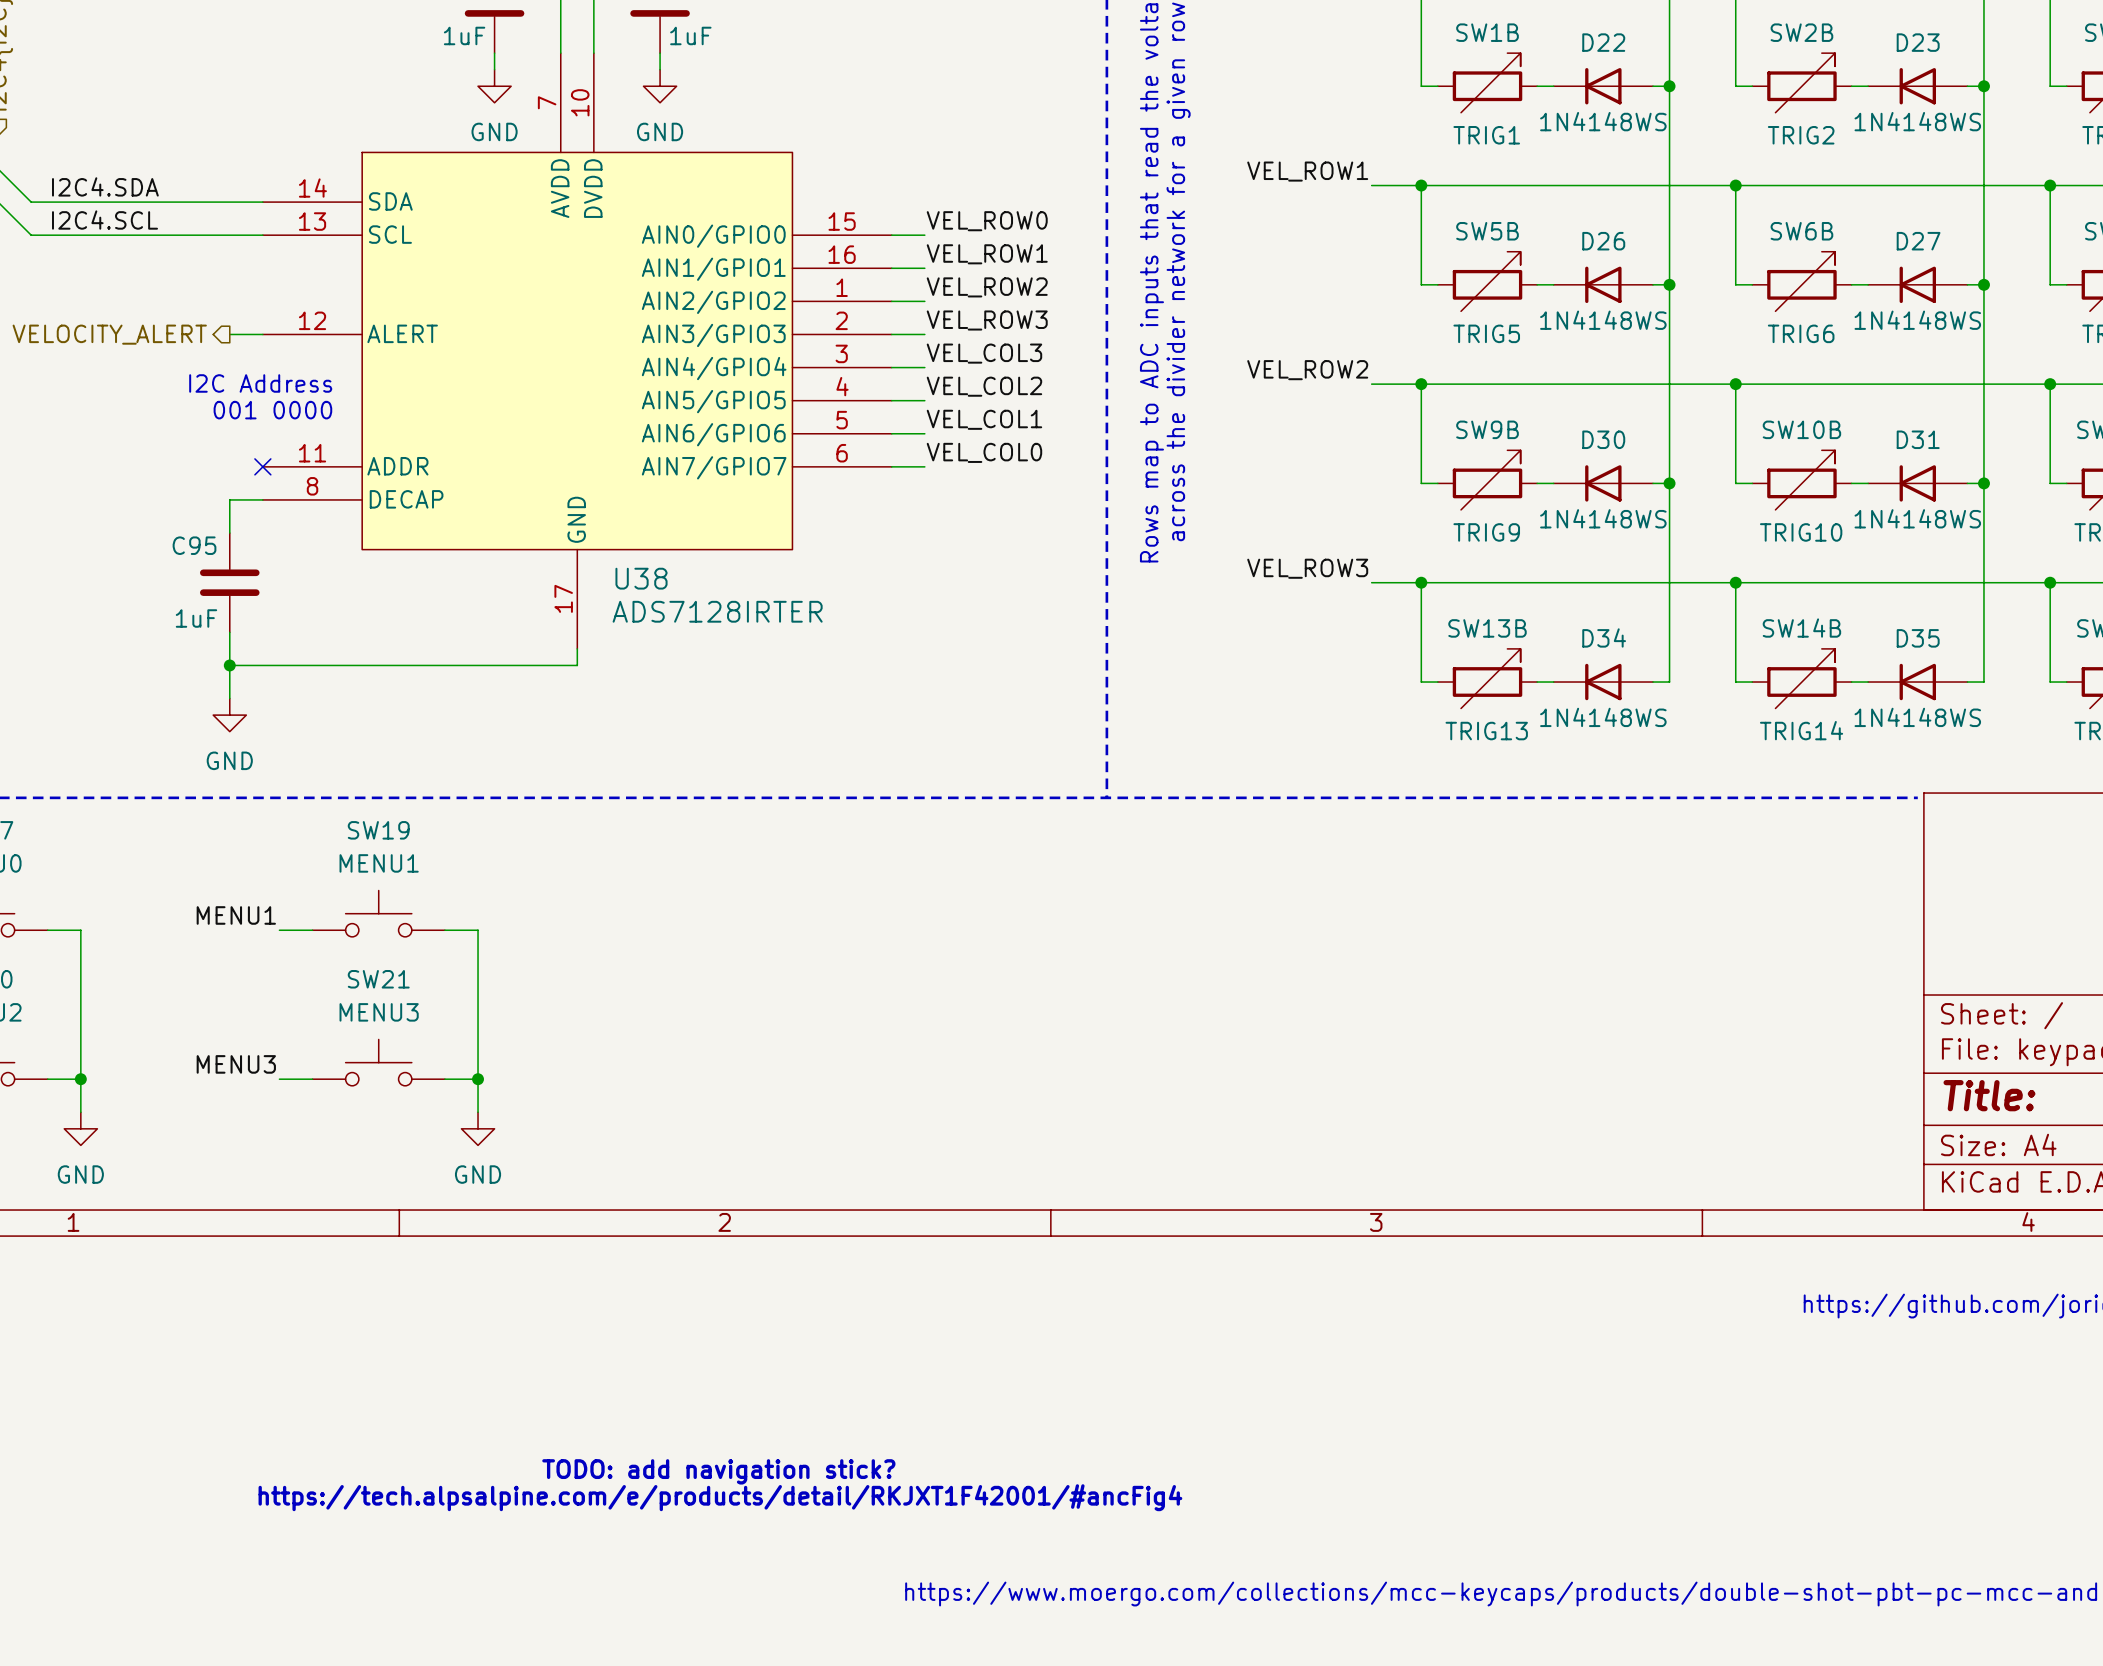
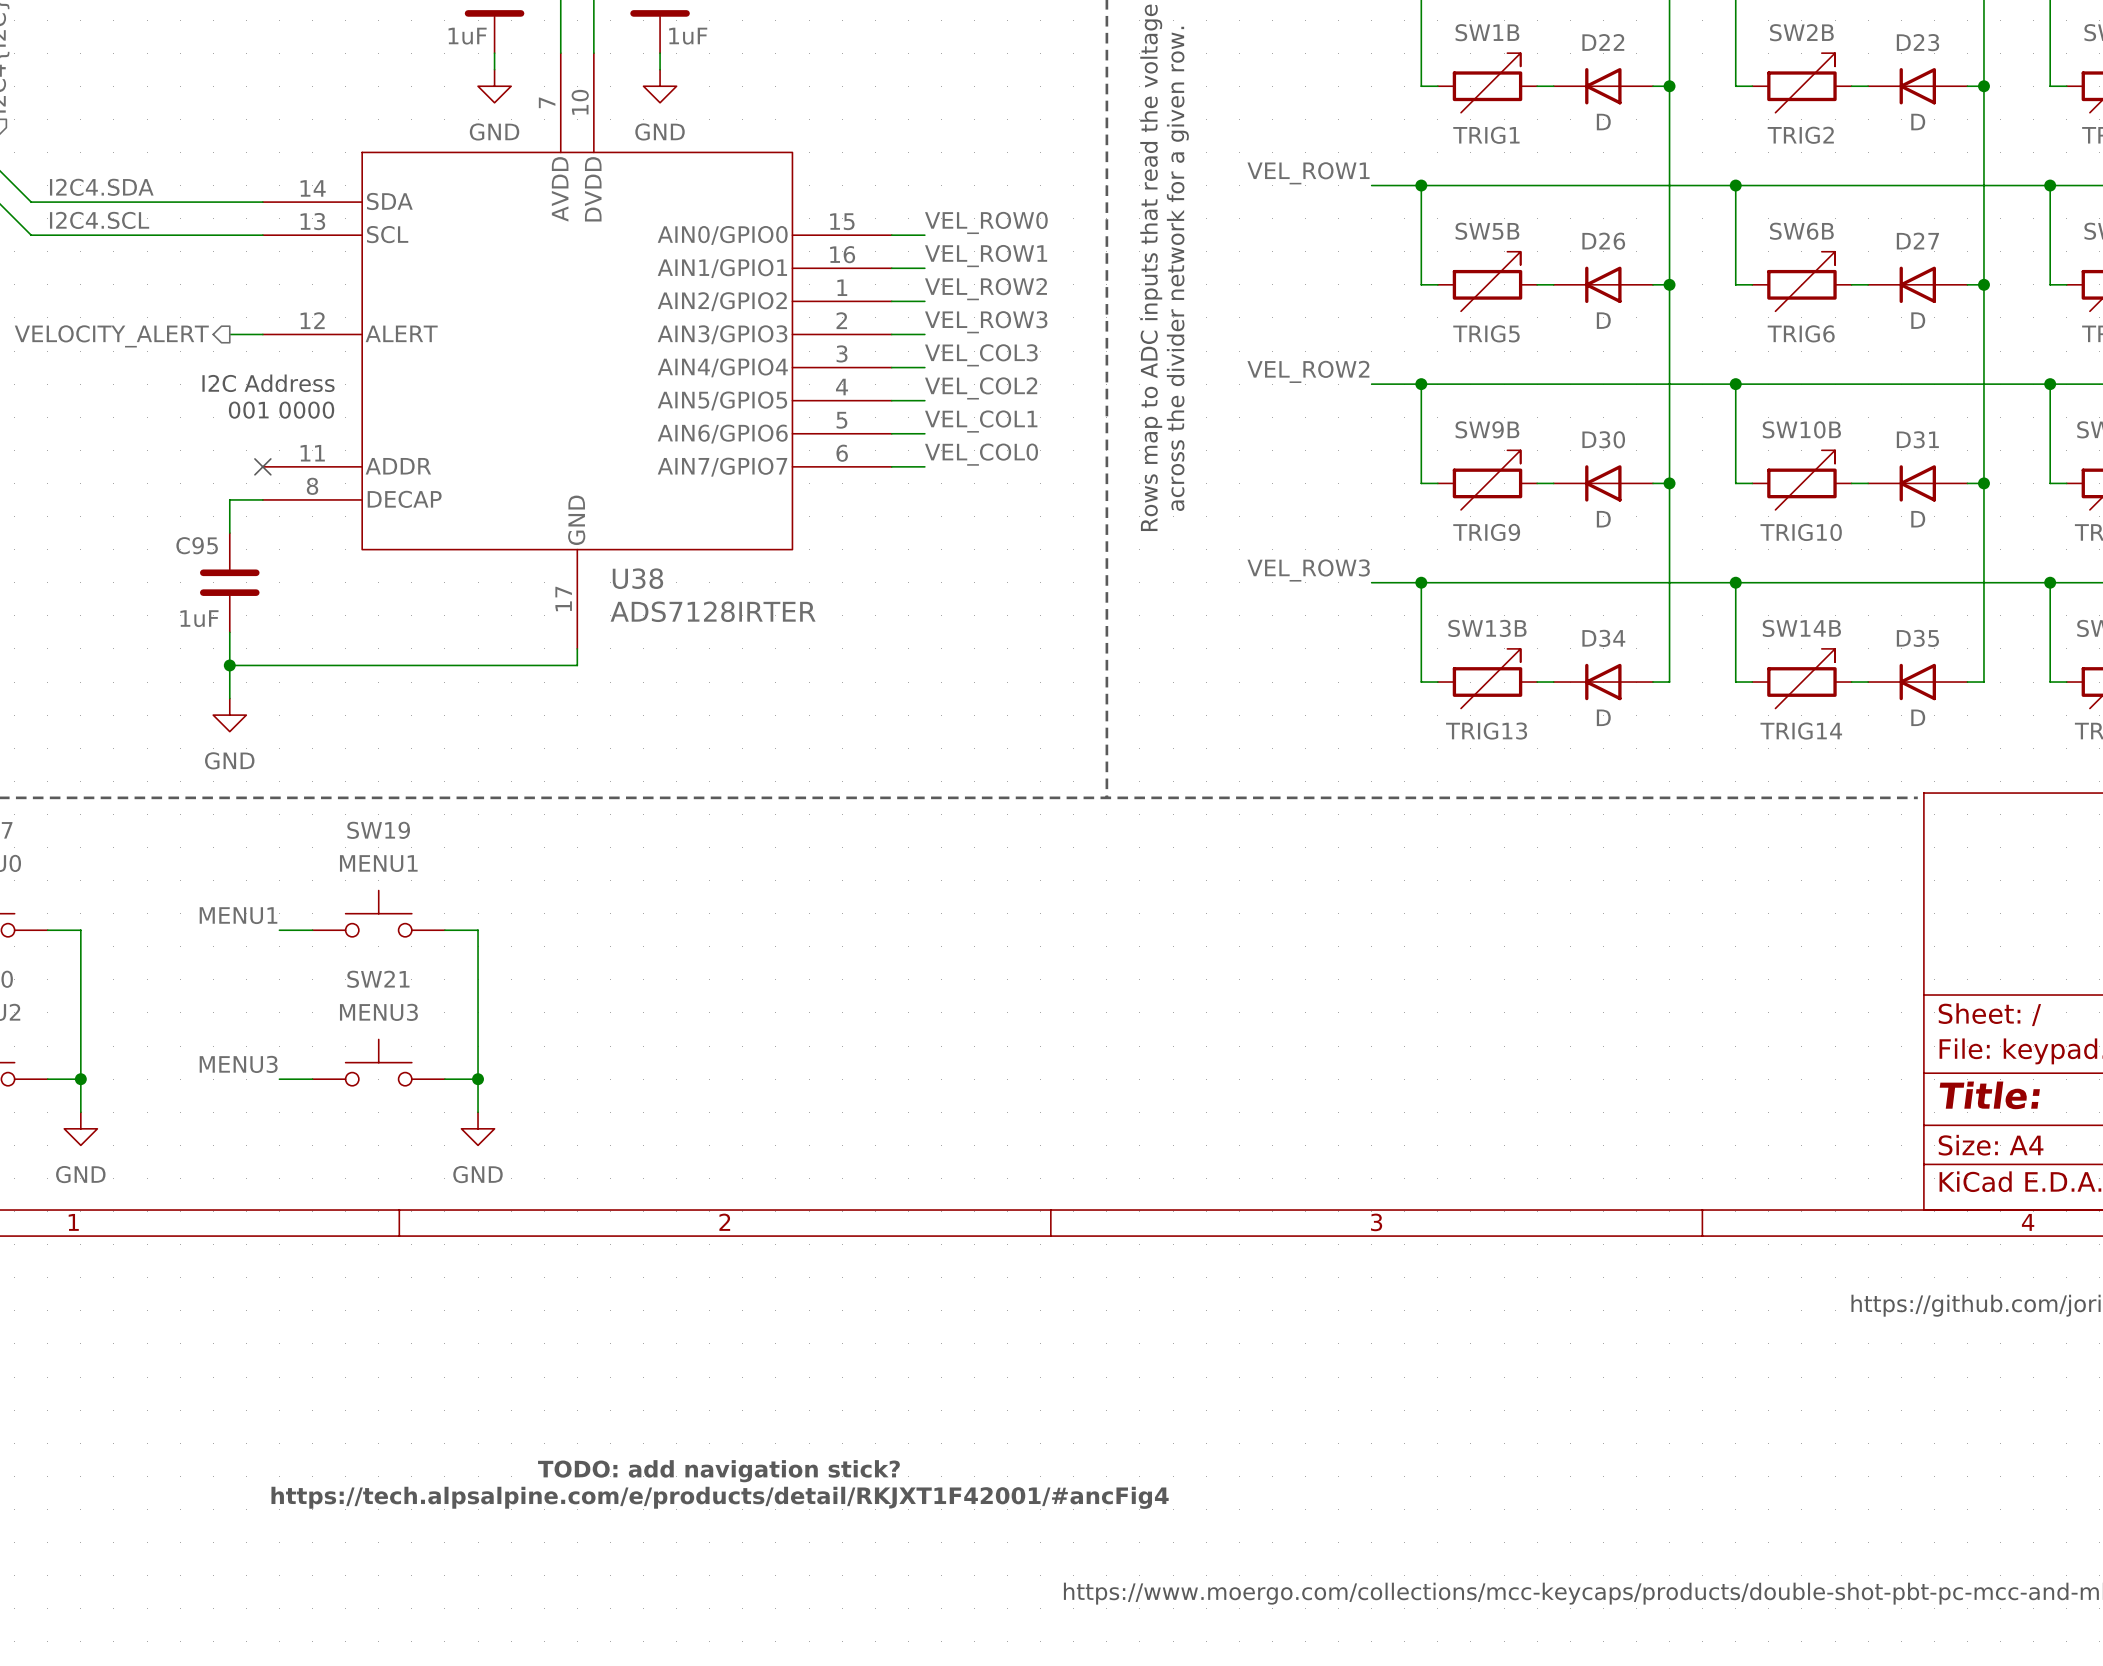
D22 value: 1N4148WS (1603, 121) -> D (1603, 122)
D23 value: 1N4148WS (1917, 121) -> D (1918, 122)
D26 value: 1N4148WS (1603, 320) -> D (1603, 320)
D27 value: 1N4148WS (1917, 320) -> D (1918, 320)
D30 value: 1N4148WS (1603, 518) -> D (1603, 519)
D31 value: 1N4148WS (1917, 518) -> D (1918, 519)
D34 value: 1N4148WS (1603, 717) -> D (1603, 717)
D35 value: 1N4148WS (1917, 717) -> D (1918, 717)

